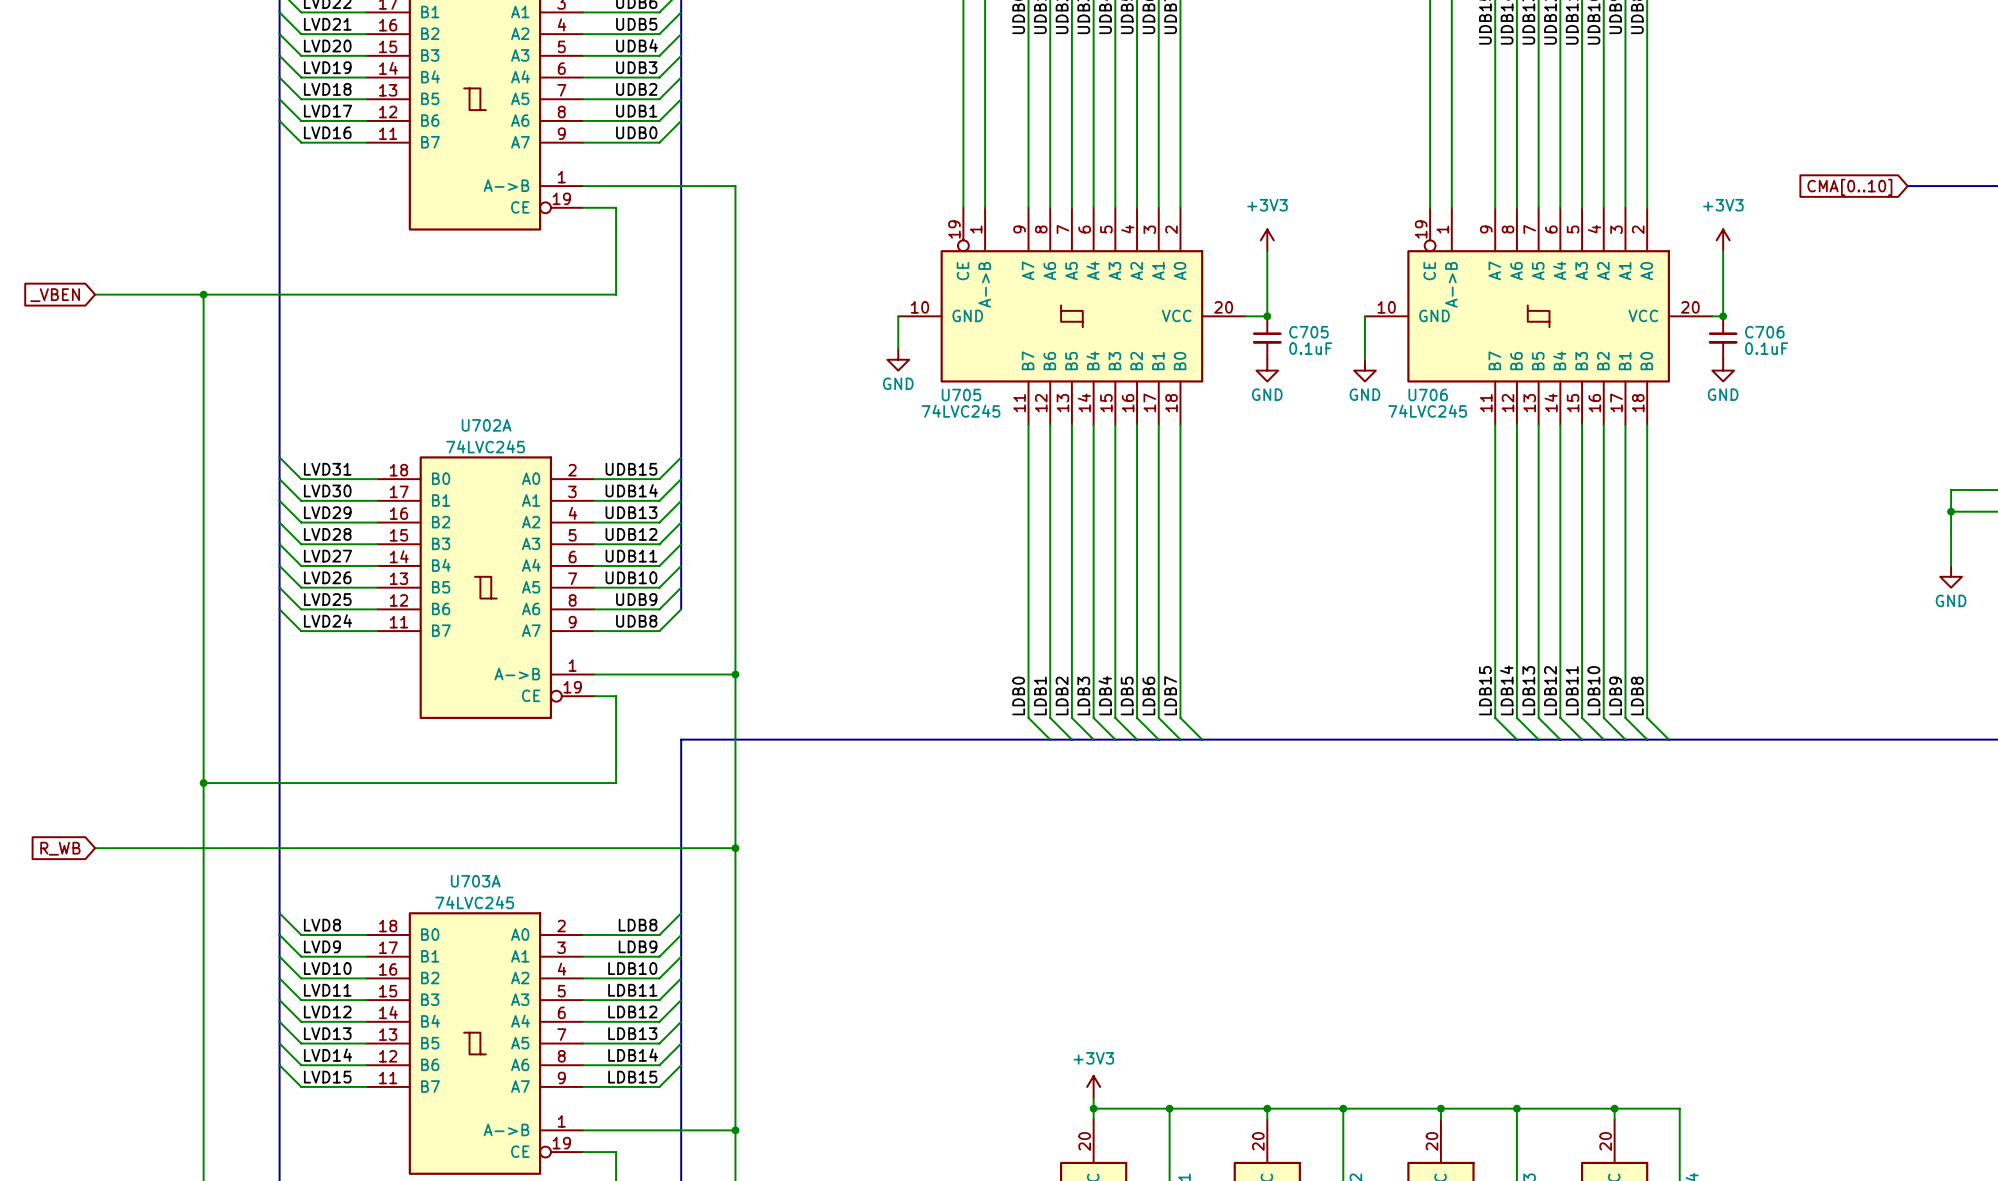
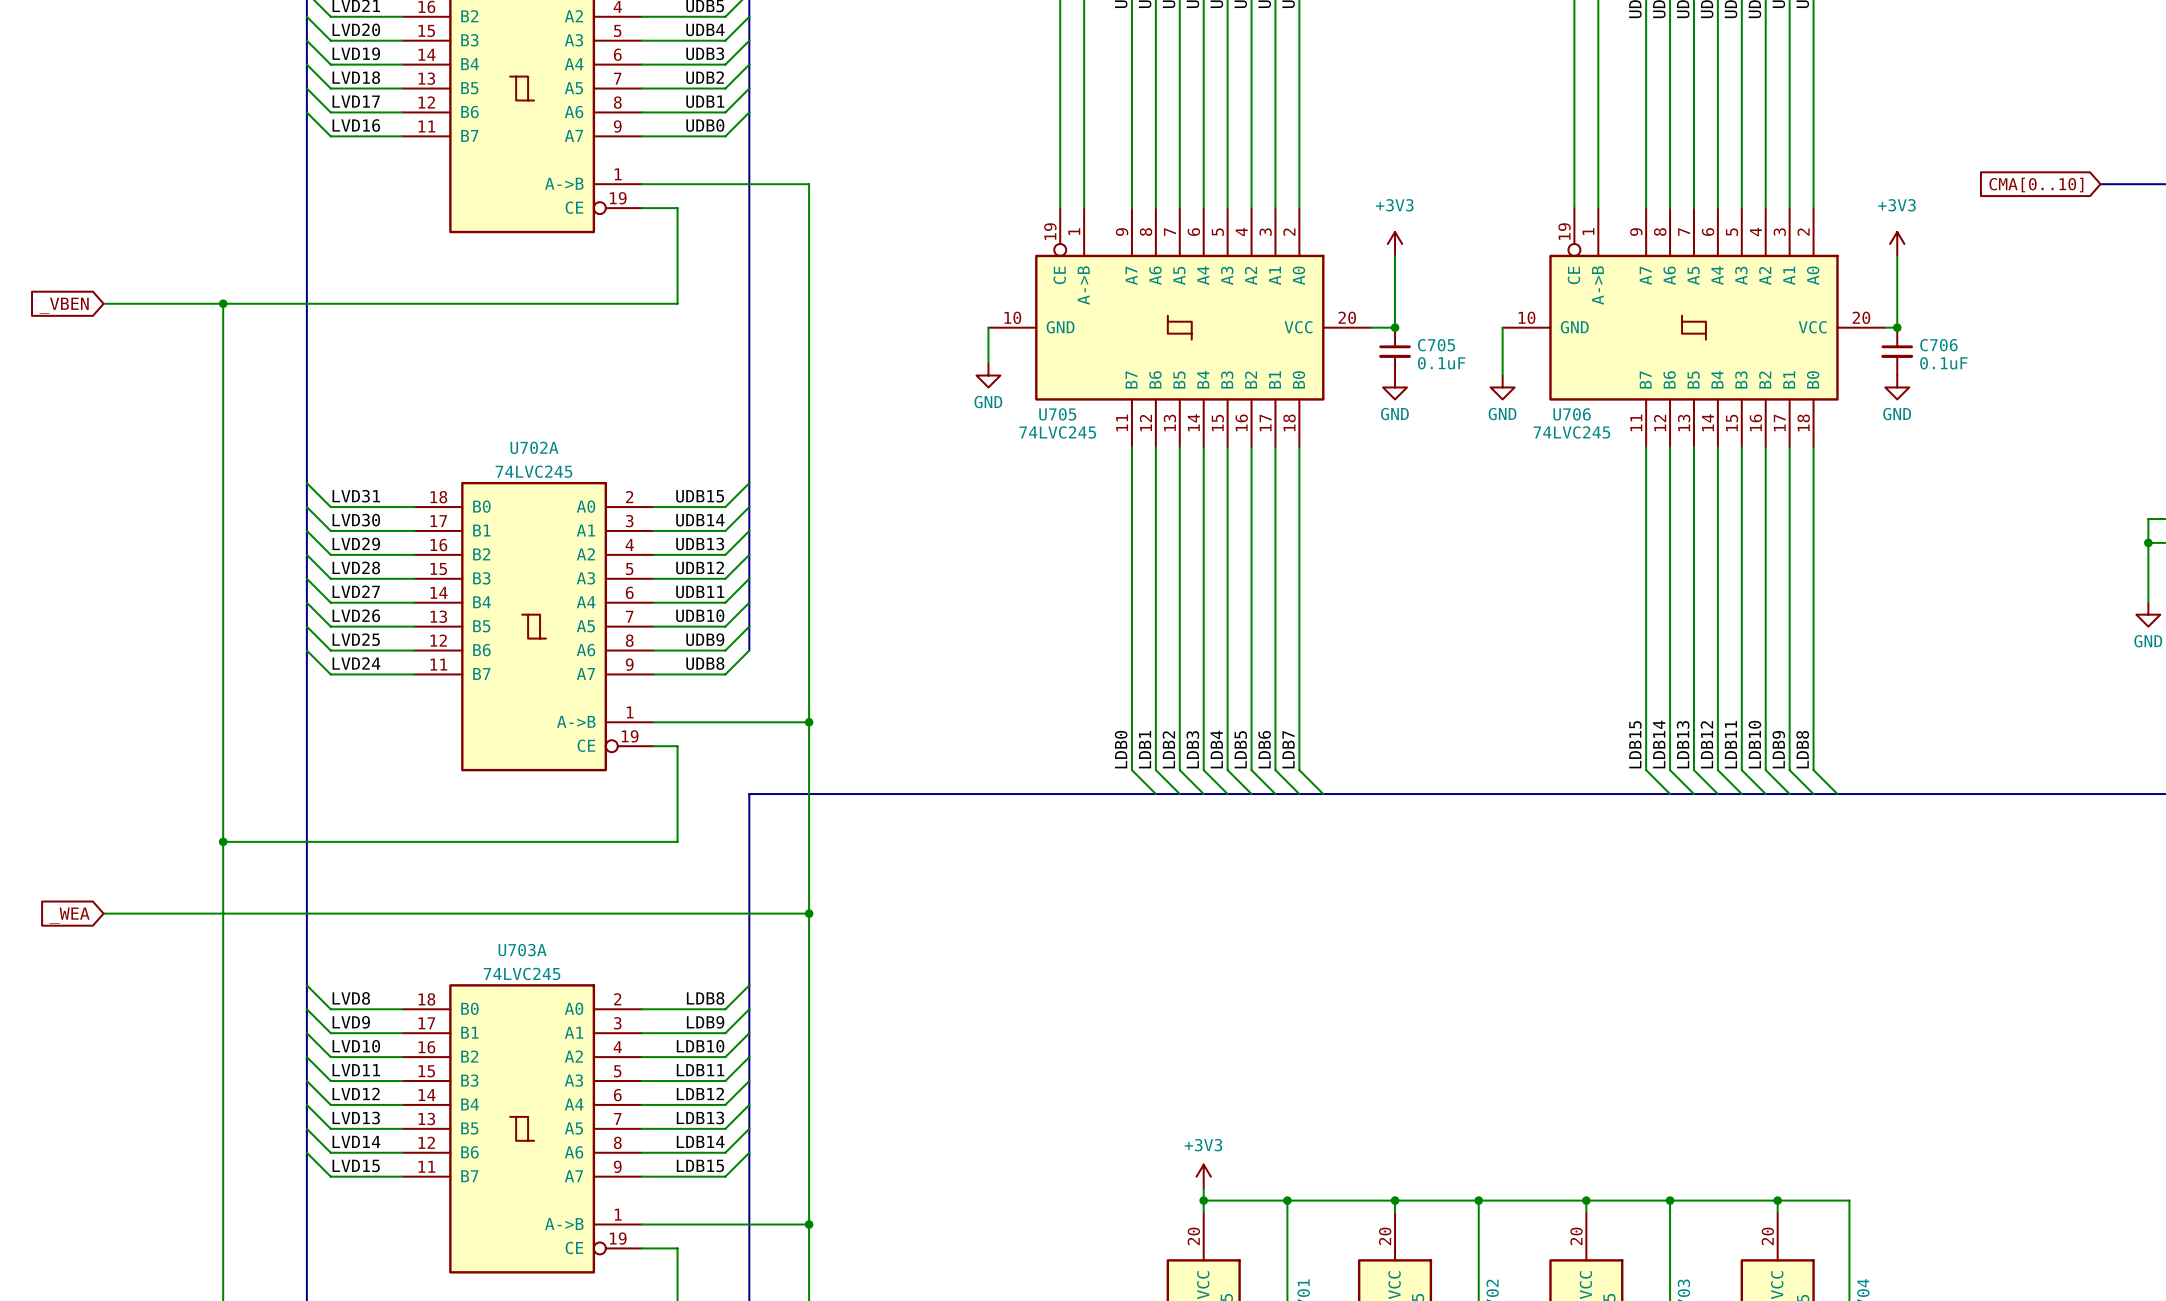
global label: R_WB (60, 848) -> _WEA (69, 915)

